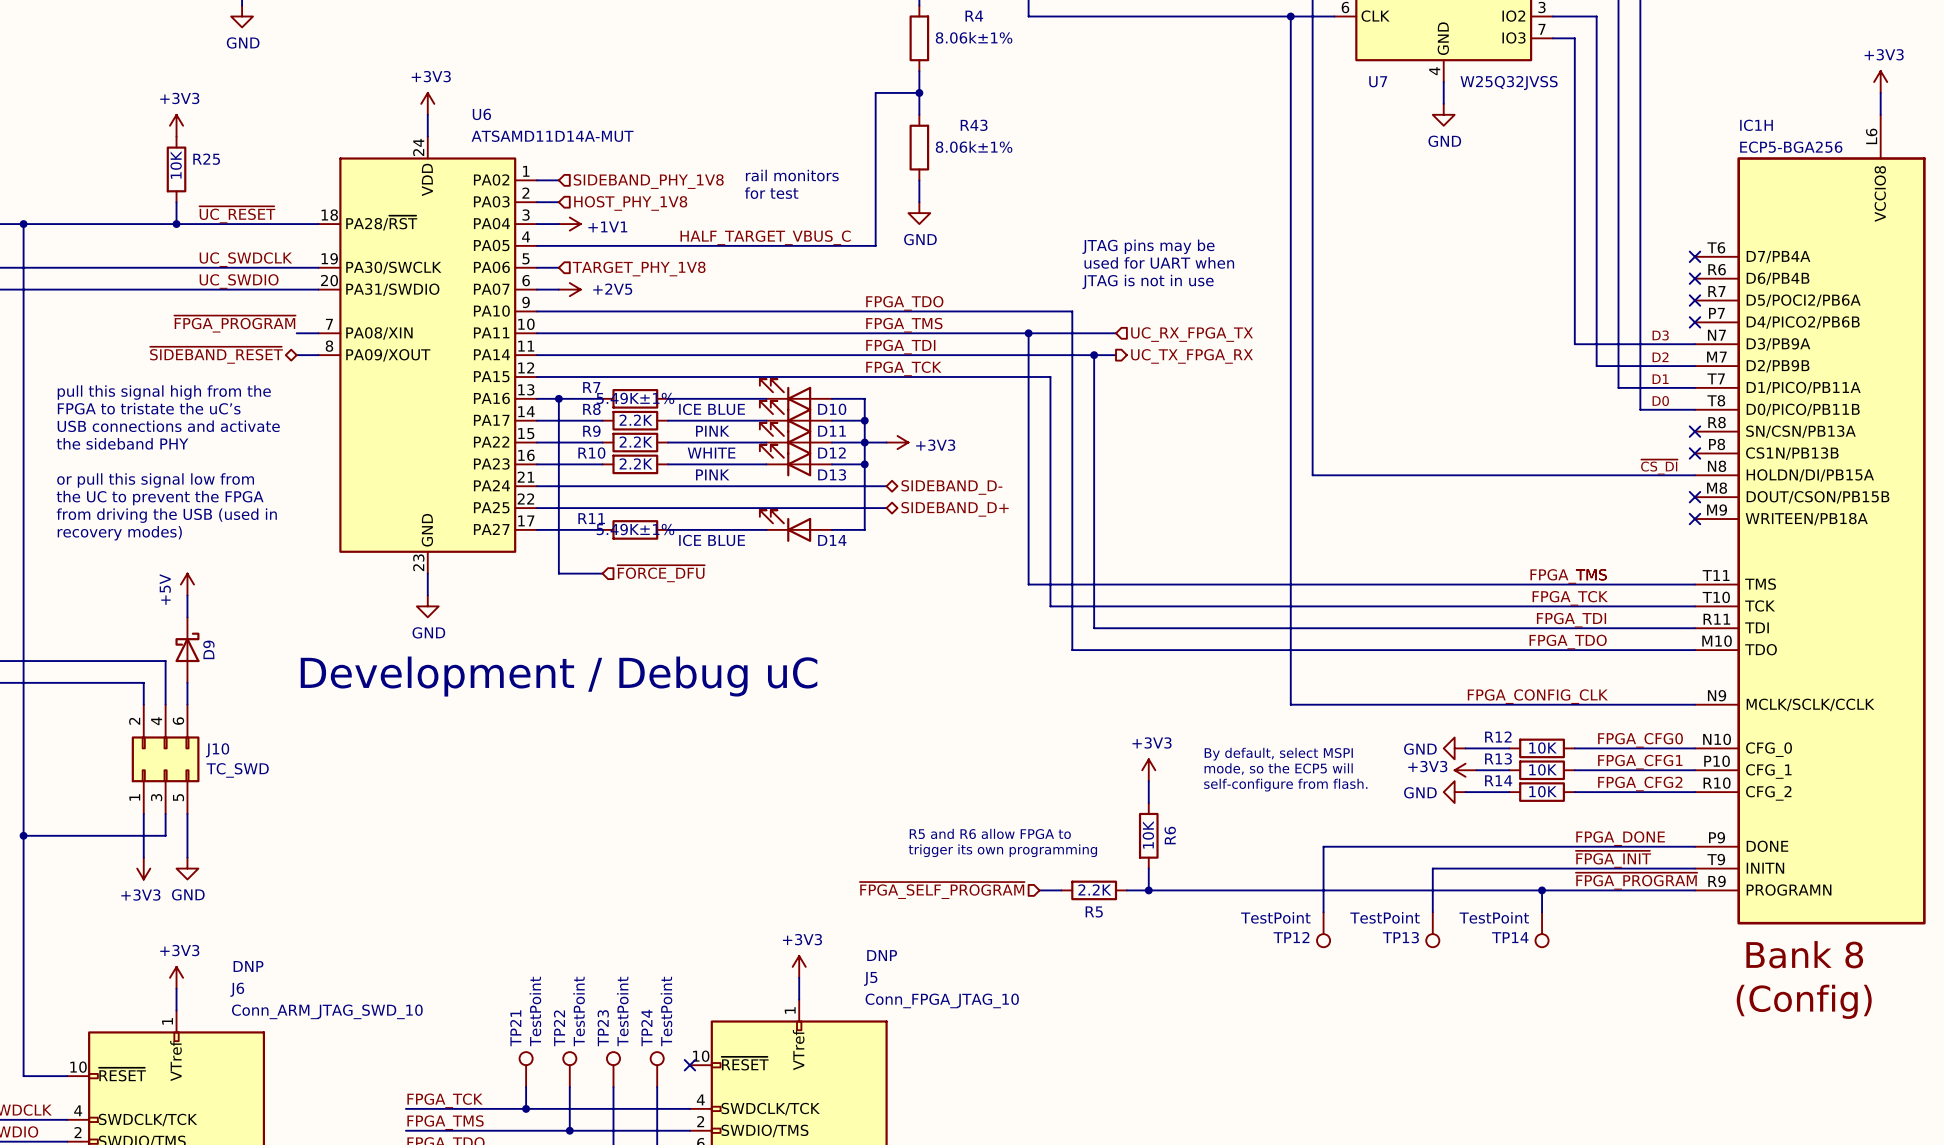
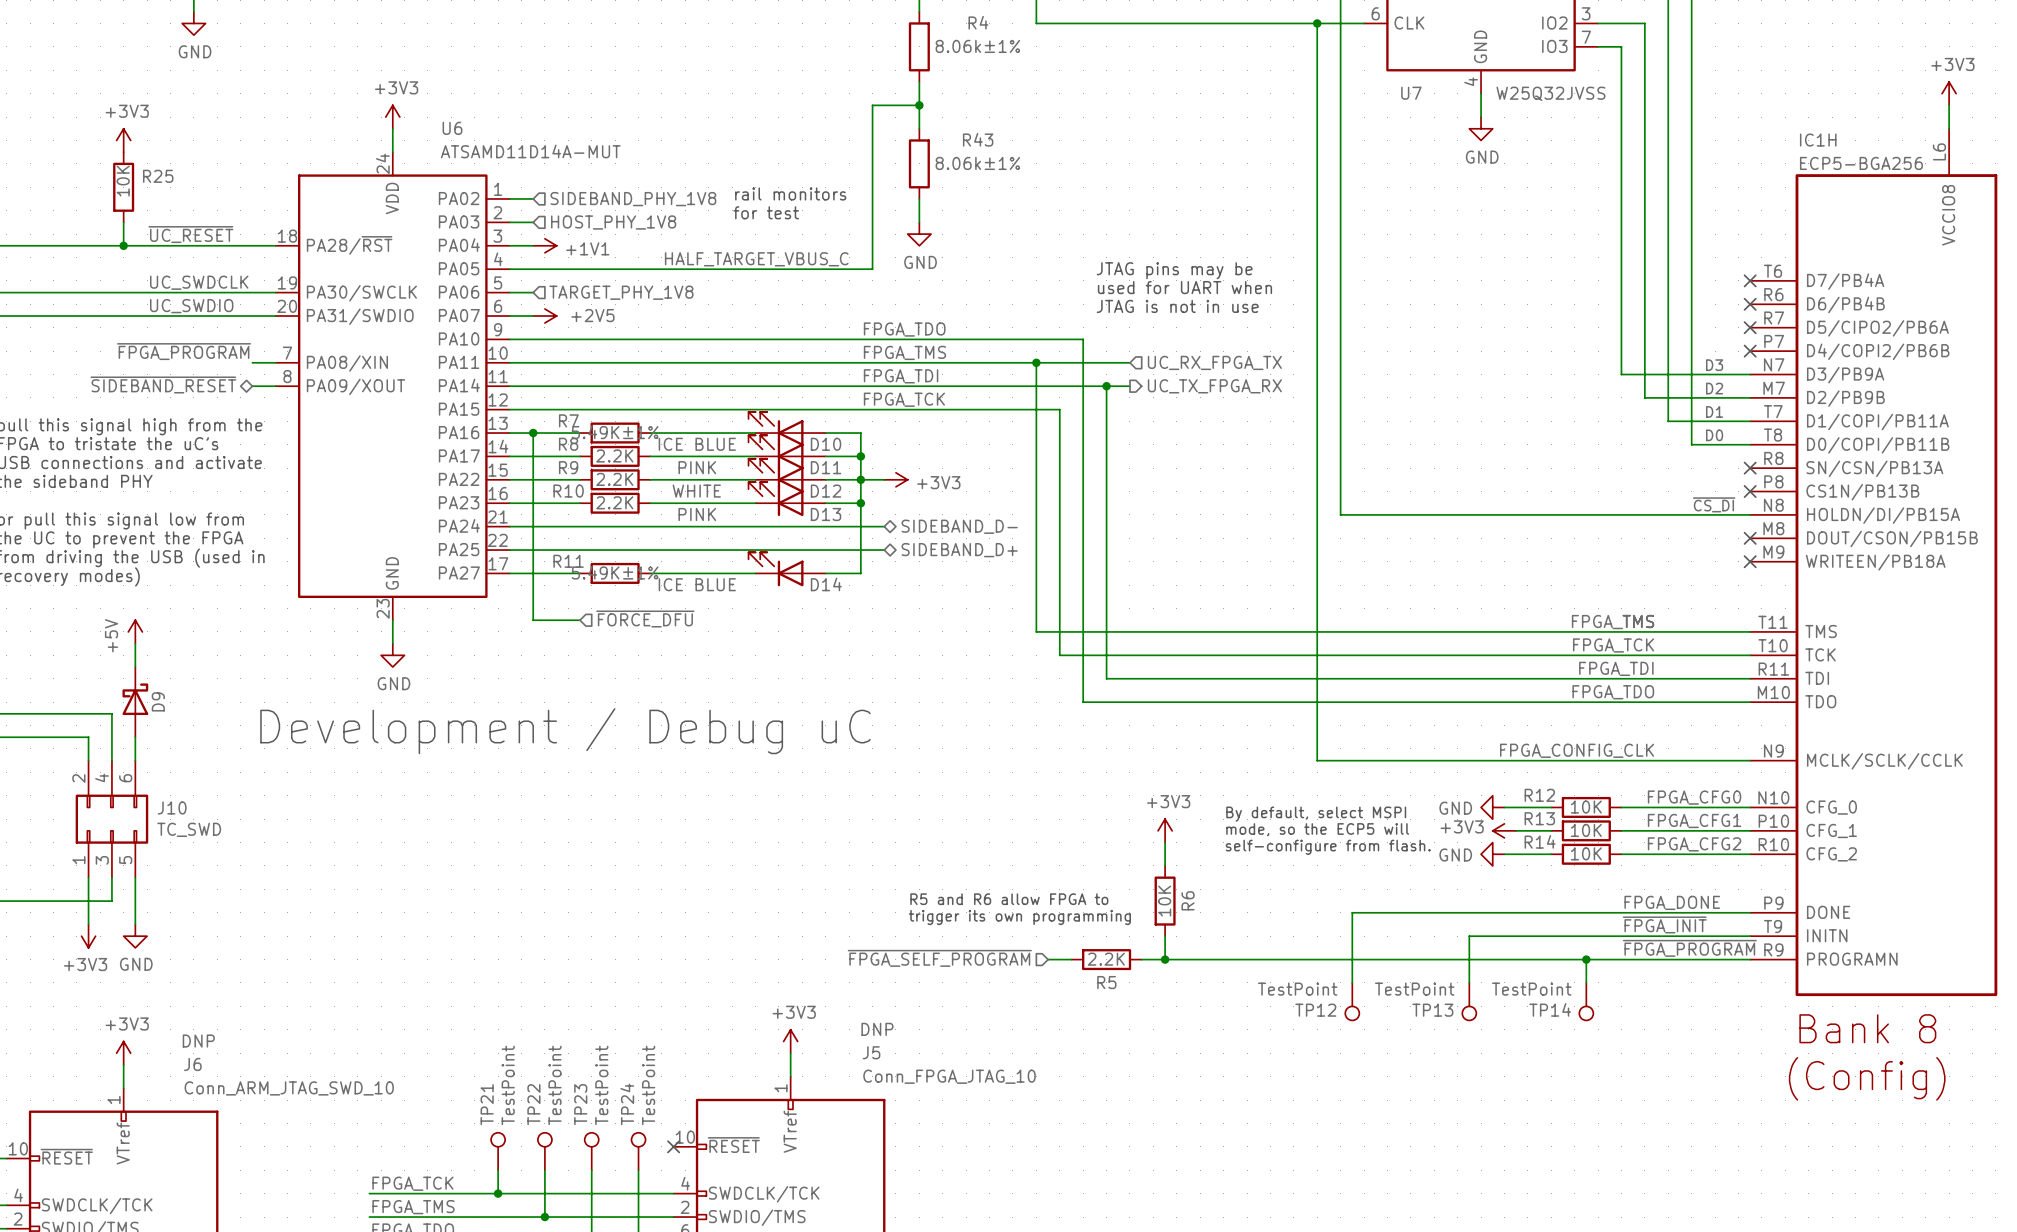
IC1H pin name: D5/POCI2/PB6A (1803, 300) -> D5/CIPO2/PB6A (1877, 328)
IC1H pin name: D4/PICO2/PB6B (1803, 322) -> D4/COPI2/PB6B (1878, 351)
IC1H pin name: D1/PICO/PB11A (1803, 388) -> D1/COPI/PB11A (1877, 421)
IC1H pin name: D0/PICO/PB11B (1803, 409) -> D0/COPI/PB11B (1878, 445)

